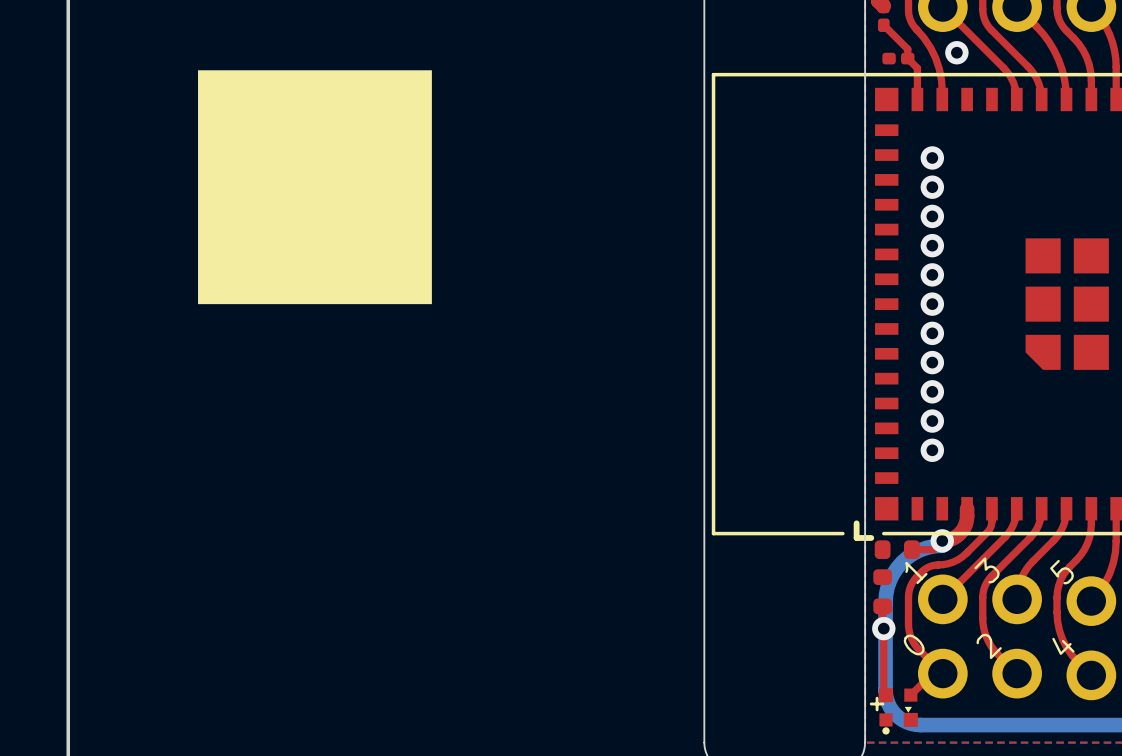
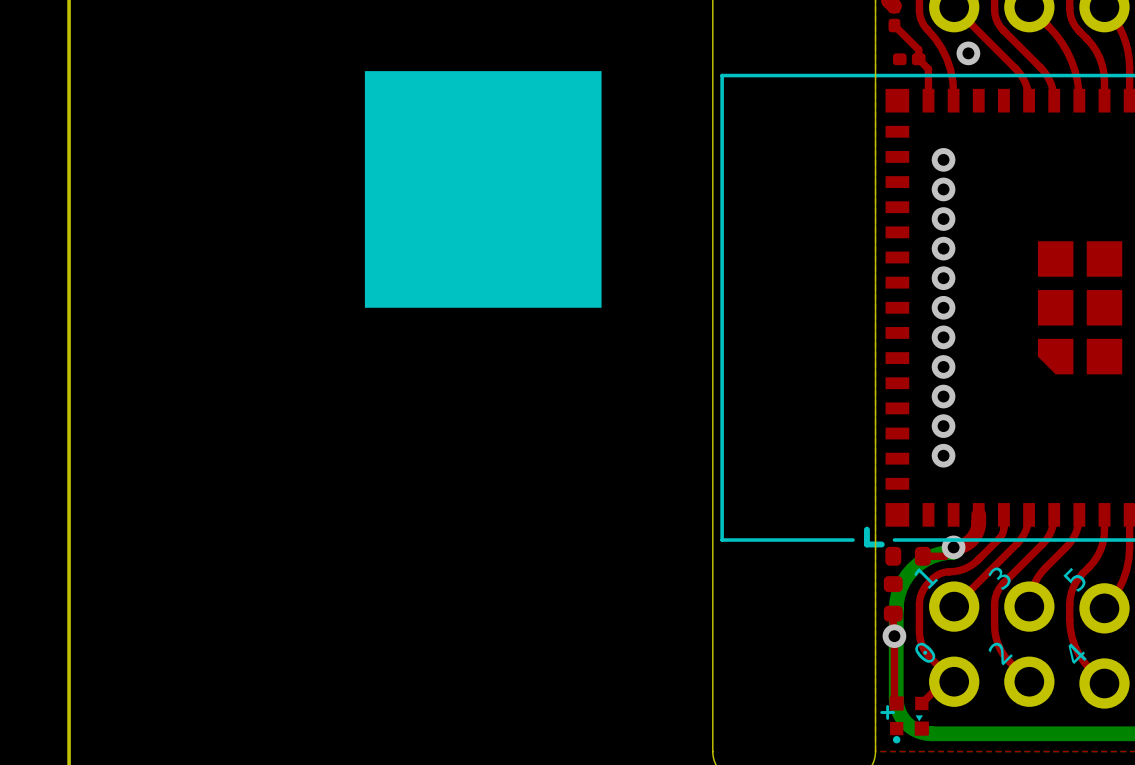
drawing position: (314, 187) -> (483, 189)

